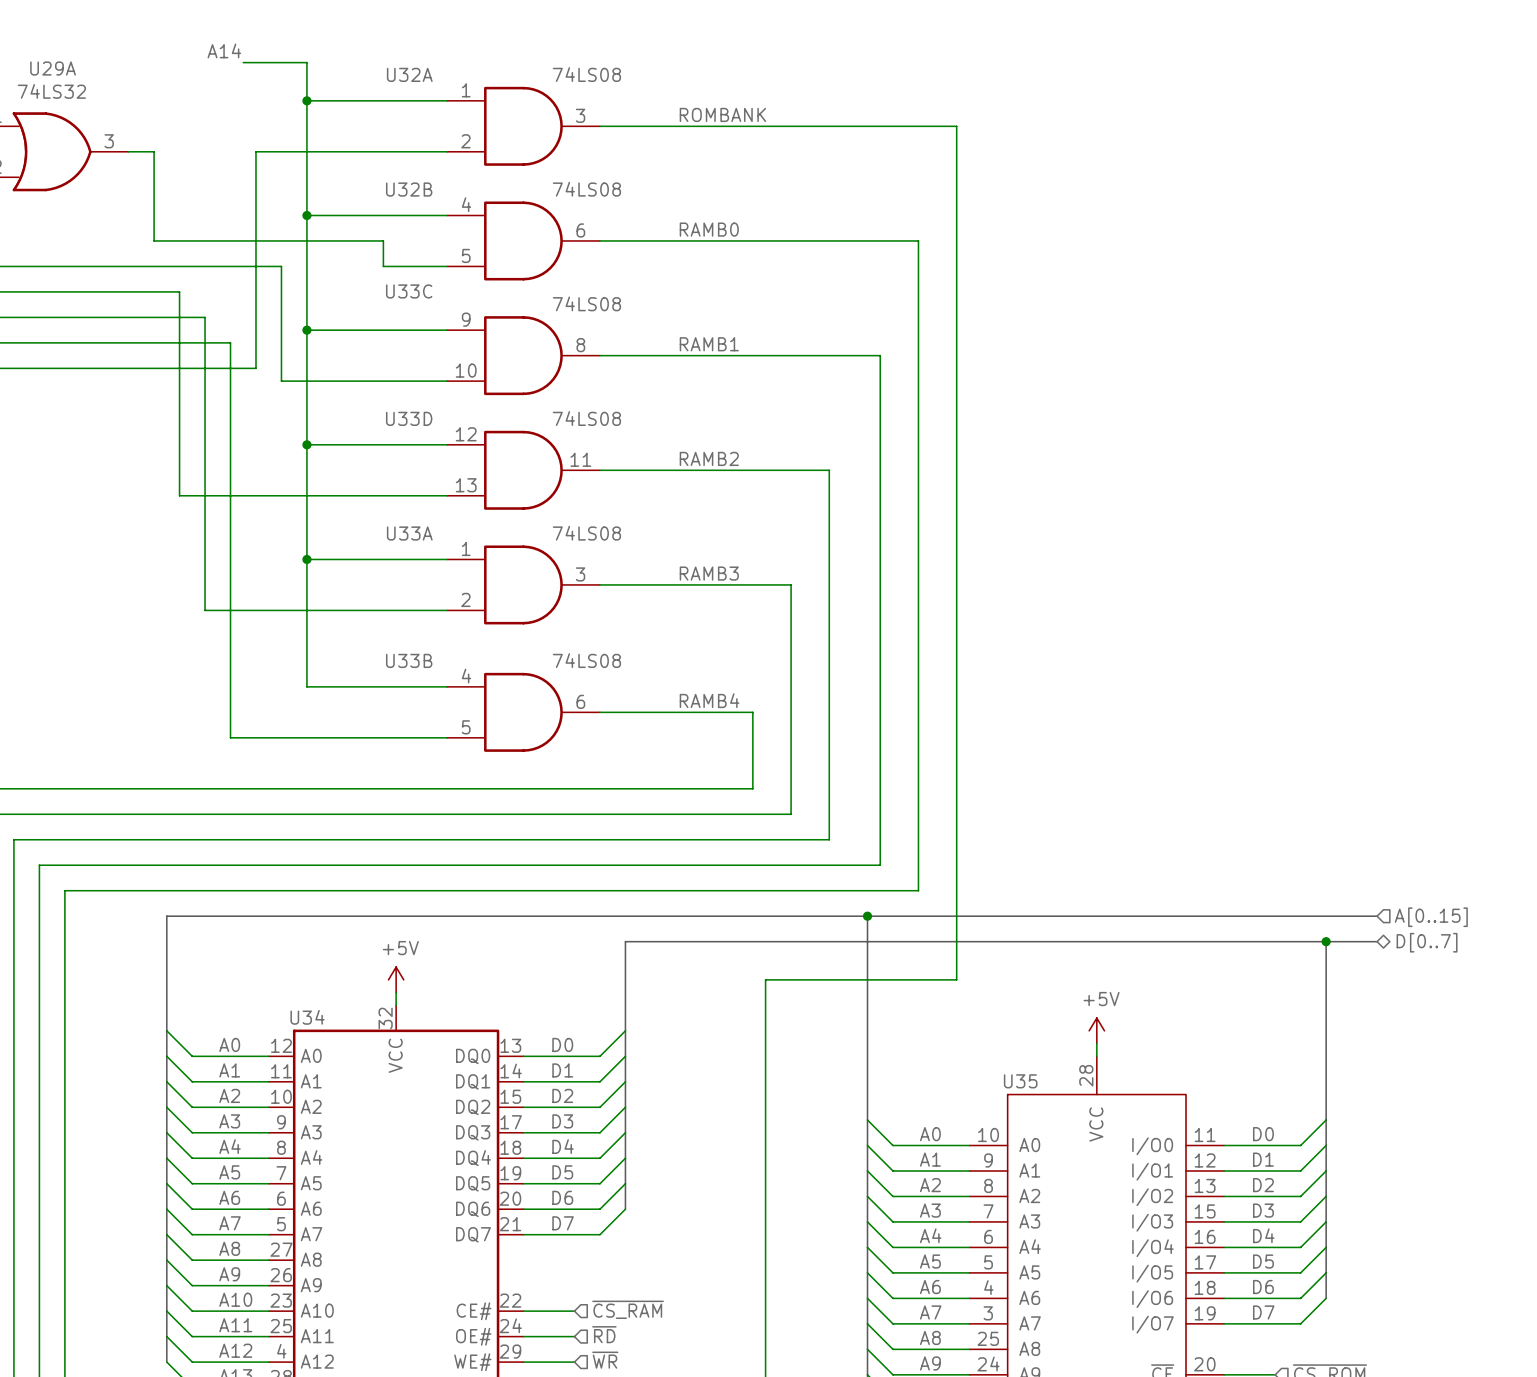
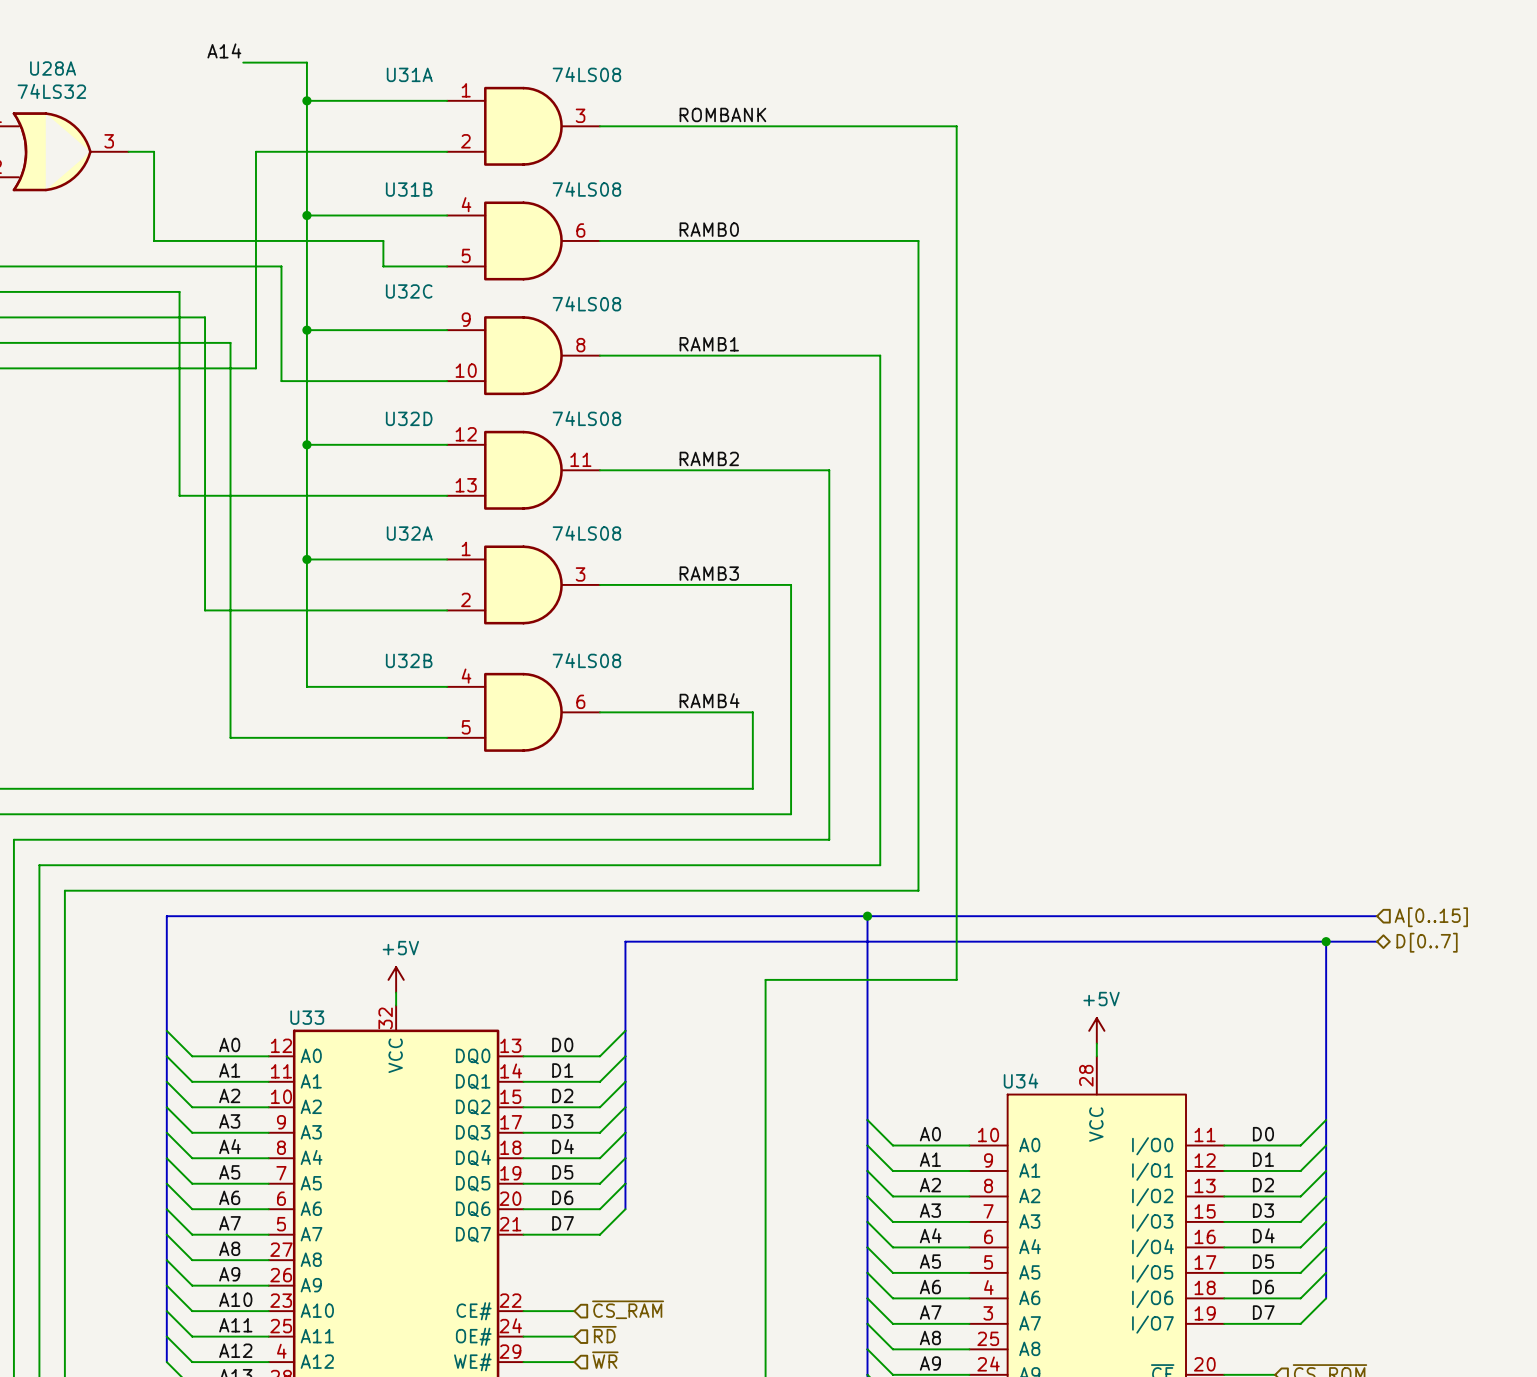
U29A name: U29A (53, 68) -> U28A (53, 68)
U32A name: U32A (409, 74) -> U31A (409, 74)
U32B name: U32B (409, 189) -> U31B (409, 189)
U33C name: U33C (409, 291) -> U32C (409, 291)
U33D name: U33D (409, 418) -> U32D (409, 418)
U33A name: U33A (409, 533) -> U32A (409, 533)
U33B name: U33B (409, 660) -> U32B (409, 660)
U34 name: U34 (307, 1017) -> U33 (307, 1017)
U35 name: U35 (1020, 1081) -> U34 (1020, 1081)

